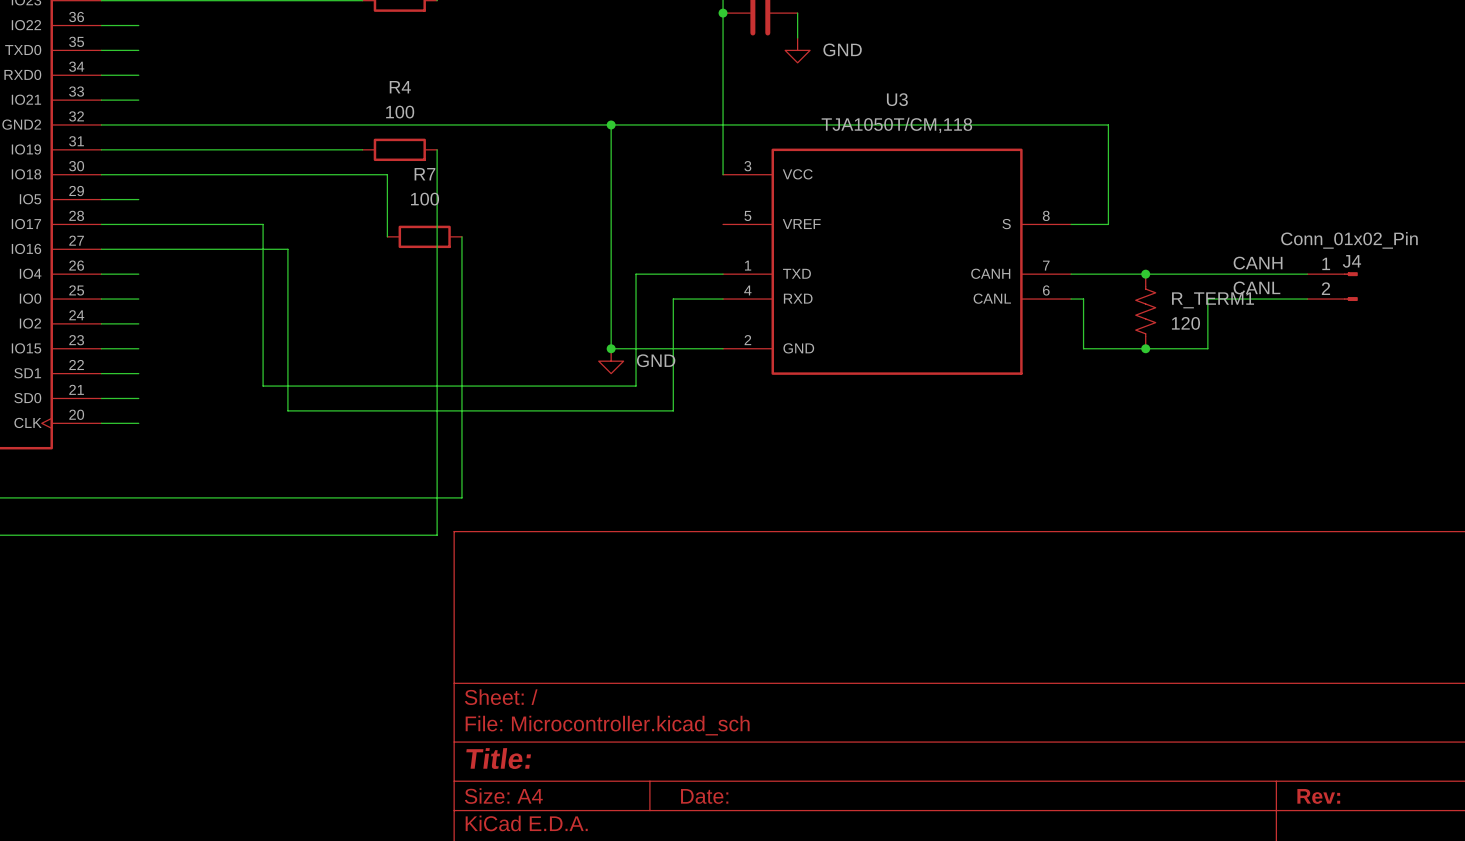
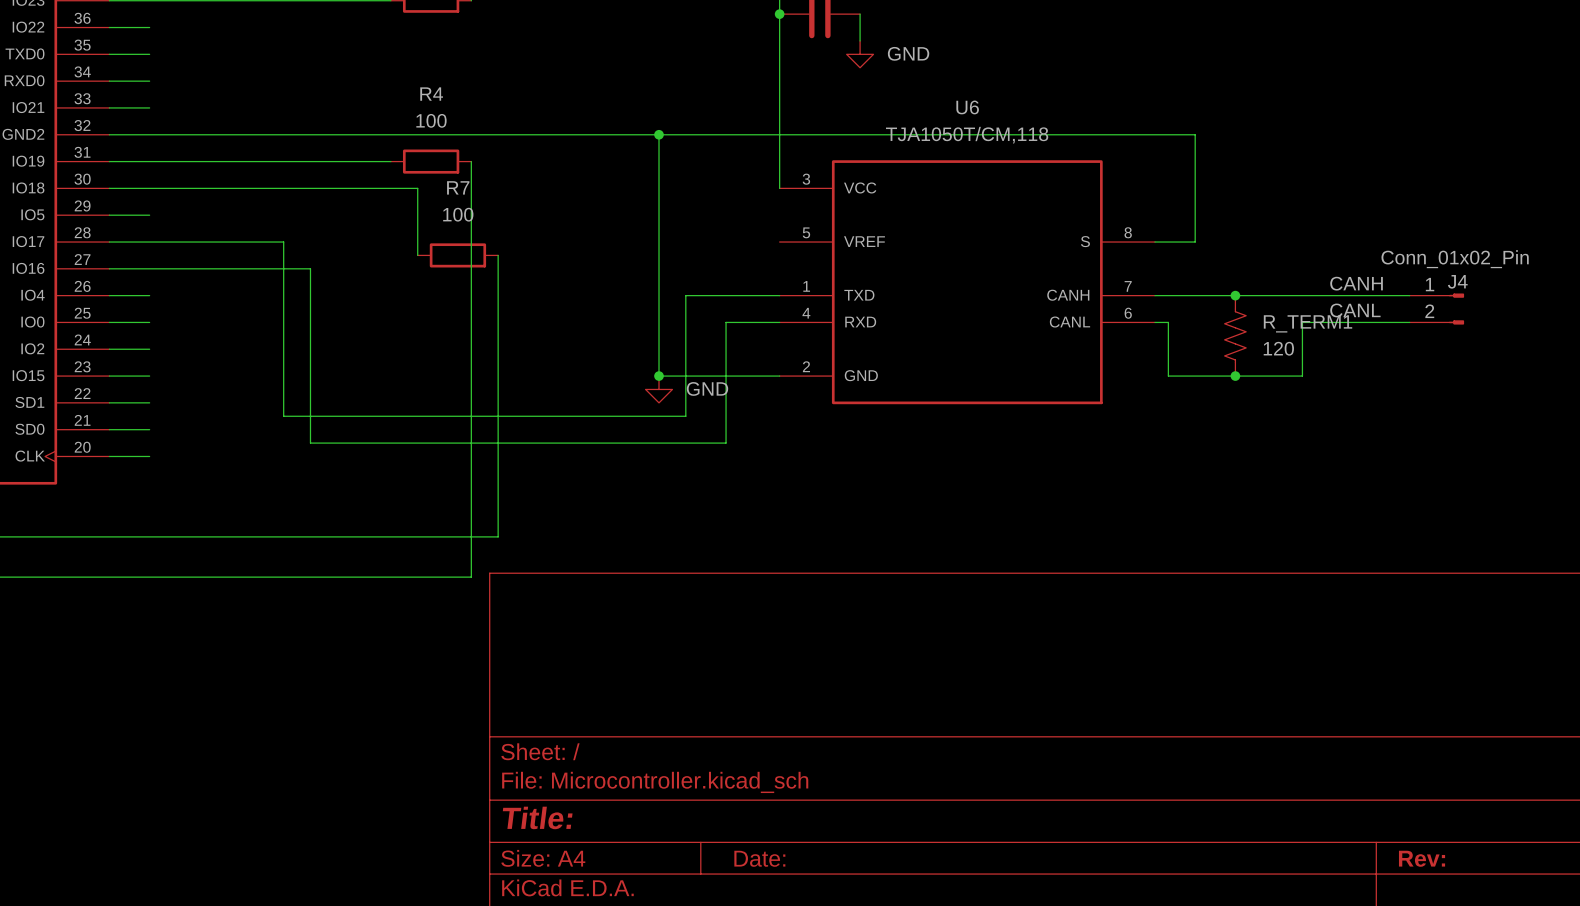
U3 name: U3 (897, 99) -> U6 (967, 107)

